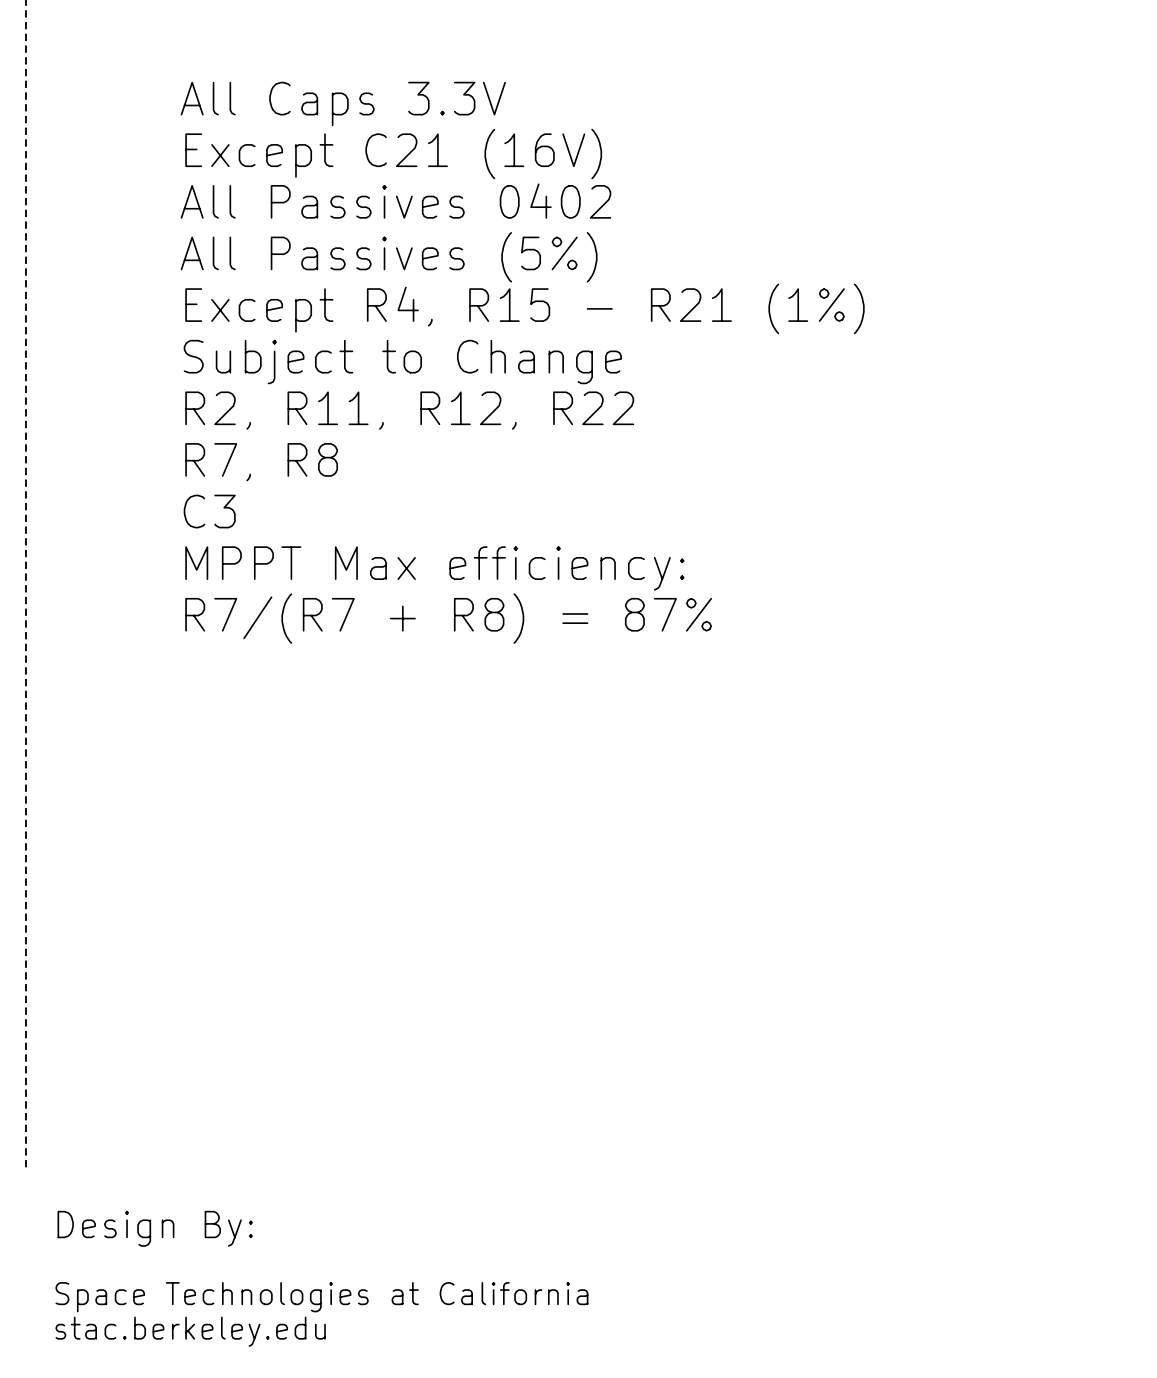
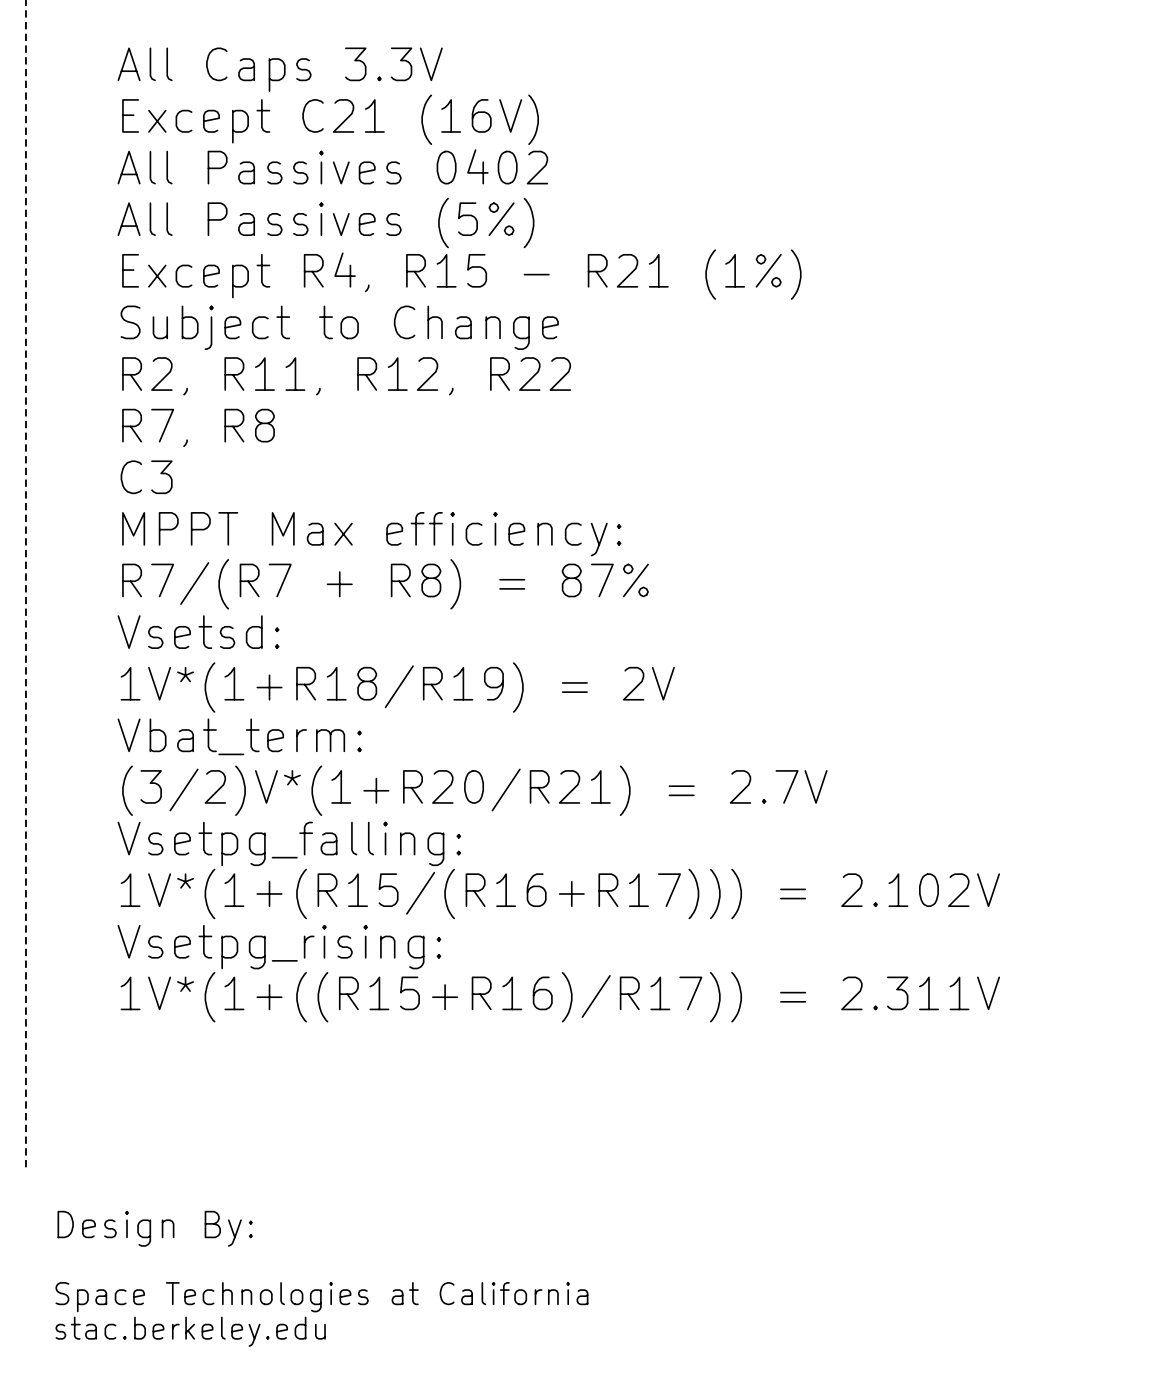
text position: All Caps 3.3V (343, 103) -> All Caps 3.3V (280, 69)
text position: Except C21 (16V) (393, 154) -> Except C21 (16V) (330, 119)
text position: All Passives 0402 (395, 201) -> All Passives 0402 (332, 166)
text position: All Passives (5%) (389, 257) -> All Passives (5%) (325, 223)
text position: Except R4, R15 - R21 (1%) (524, 308) -> Except R4, R15 - R21 (1%) (461, 274)
text position: Subject to Change (402, 362) -> Subject to Change (339, 327)
text position: R2, R11, R12, R22 (409, 410) -> R2, R11, R12, R22 (346, 376)
text position: R7, R8 (261, 462) -> R7, R8 (198, 427)
text position: C3 (209, 511) -> C3 (146, 477)
text position: MPPT Max efficiency: (434, 568) -> MPPT Max efficiency: (371, 534)
text position: R7/(R7 + R8) = 87% (448, 618) -> R7/(R7 + R8) = 87% (385, 584)
text: none -> Vsetsd: (198, 632)
text: none -> 1V*(1+R18/R19) = 2V (397, 687)
text: none -> Vbat_term: (239, 736)
text: none -> (3/2)V*(1+R20/R21) = 2.7V (474, 790)
text: none -> Vsetpg_falling: (289, 843)
text: none -> 1V*(1+(R15/(R16+R17))) = 2.102V (560, 893)
text: none -> Vsetpg_rising: (279, 947)
text: none -> 1V*(1+((R15+R16)/R17)) = 2.311V (560, 997)

